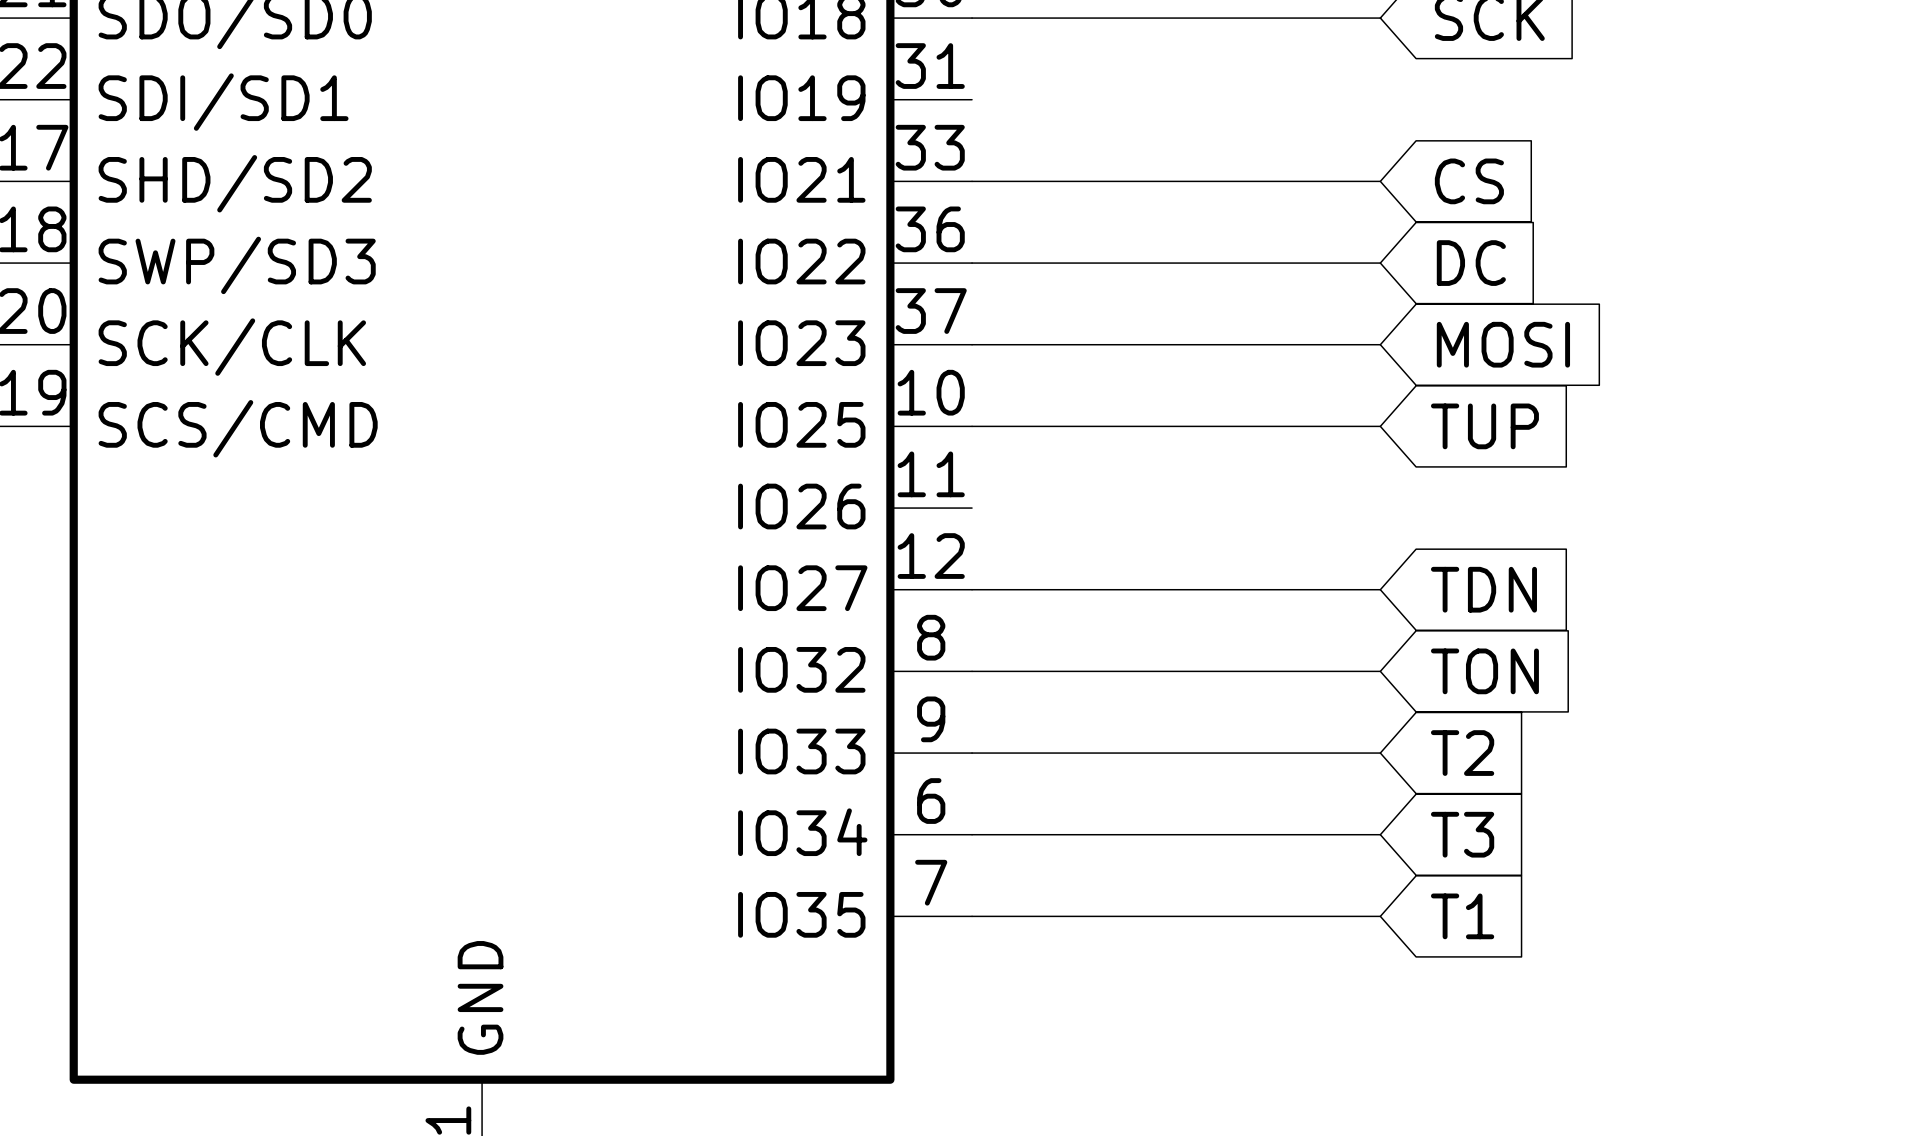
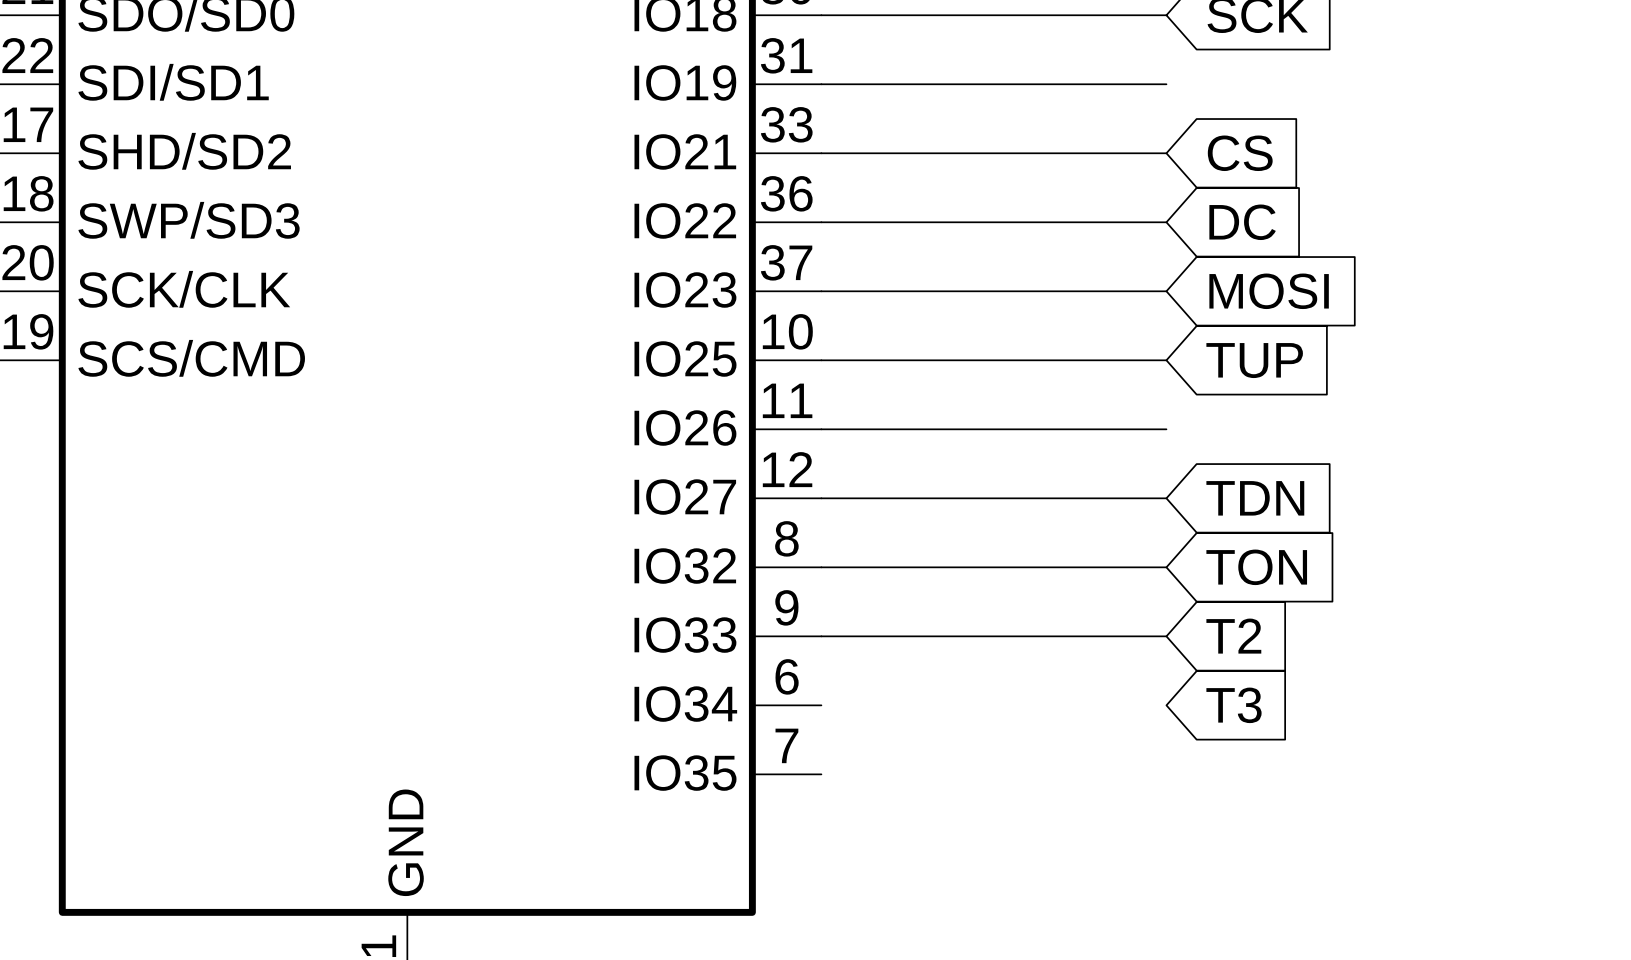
wire: none -> (821, 84) (1166, 84)
wire: (972, 834) (1380, 834) -> (821, 429) (1166, 429)
wire: (972, 916) (1380, 916) -> none
global label: T1 (1462, 916) -> none

